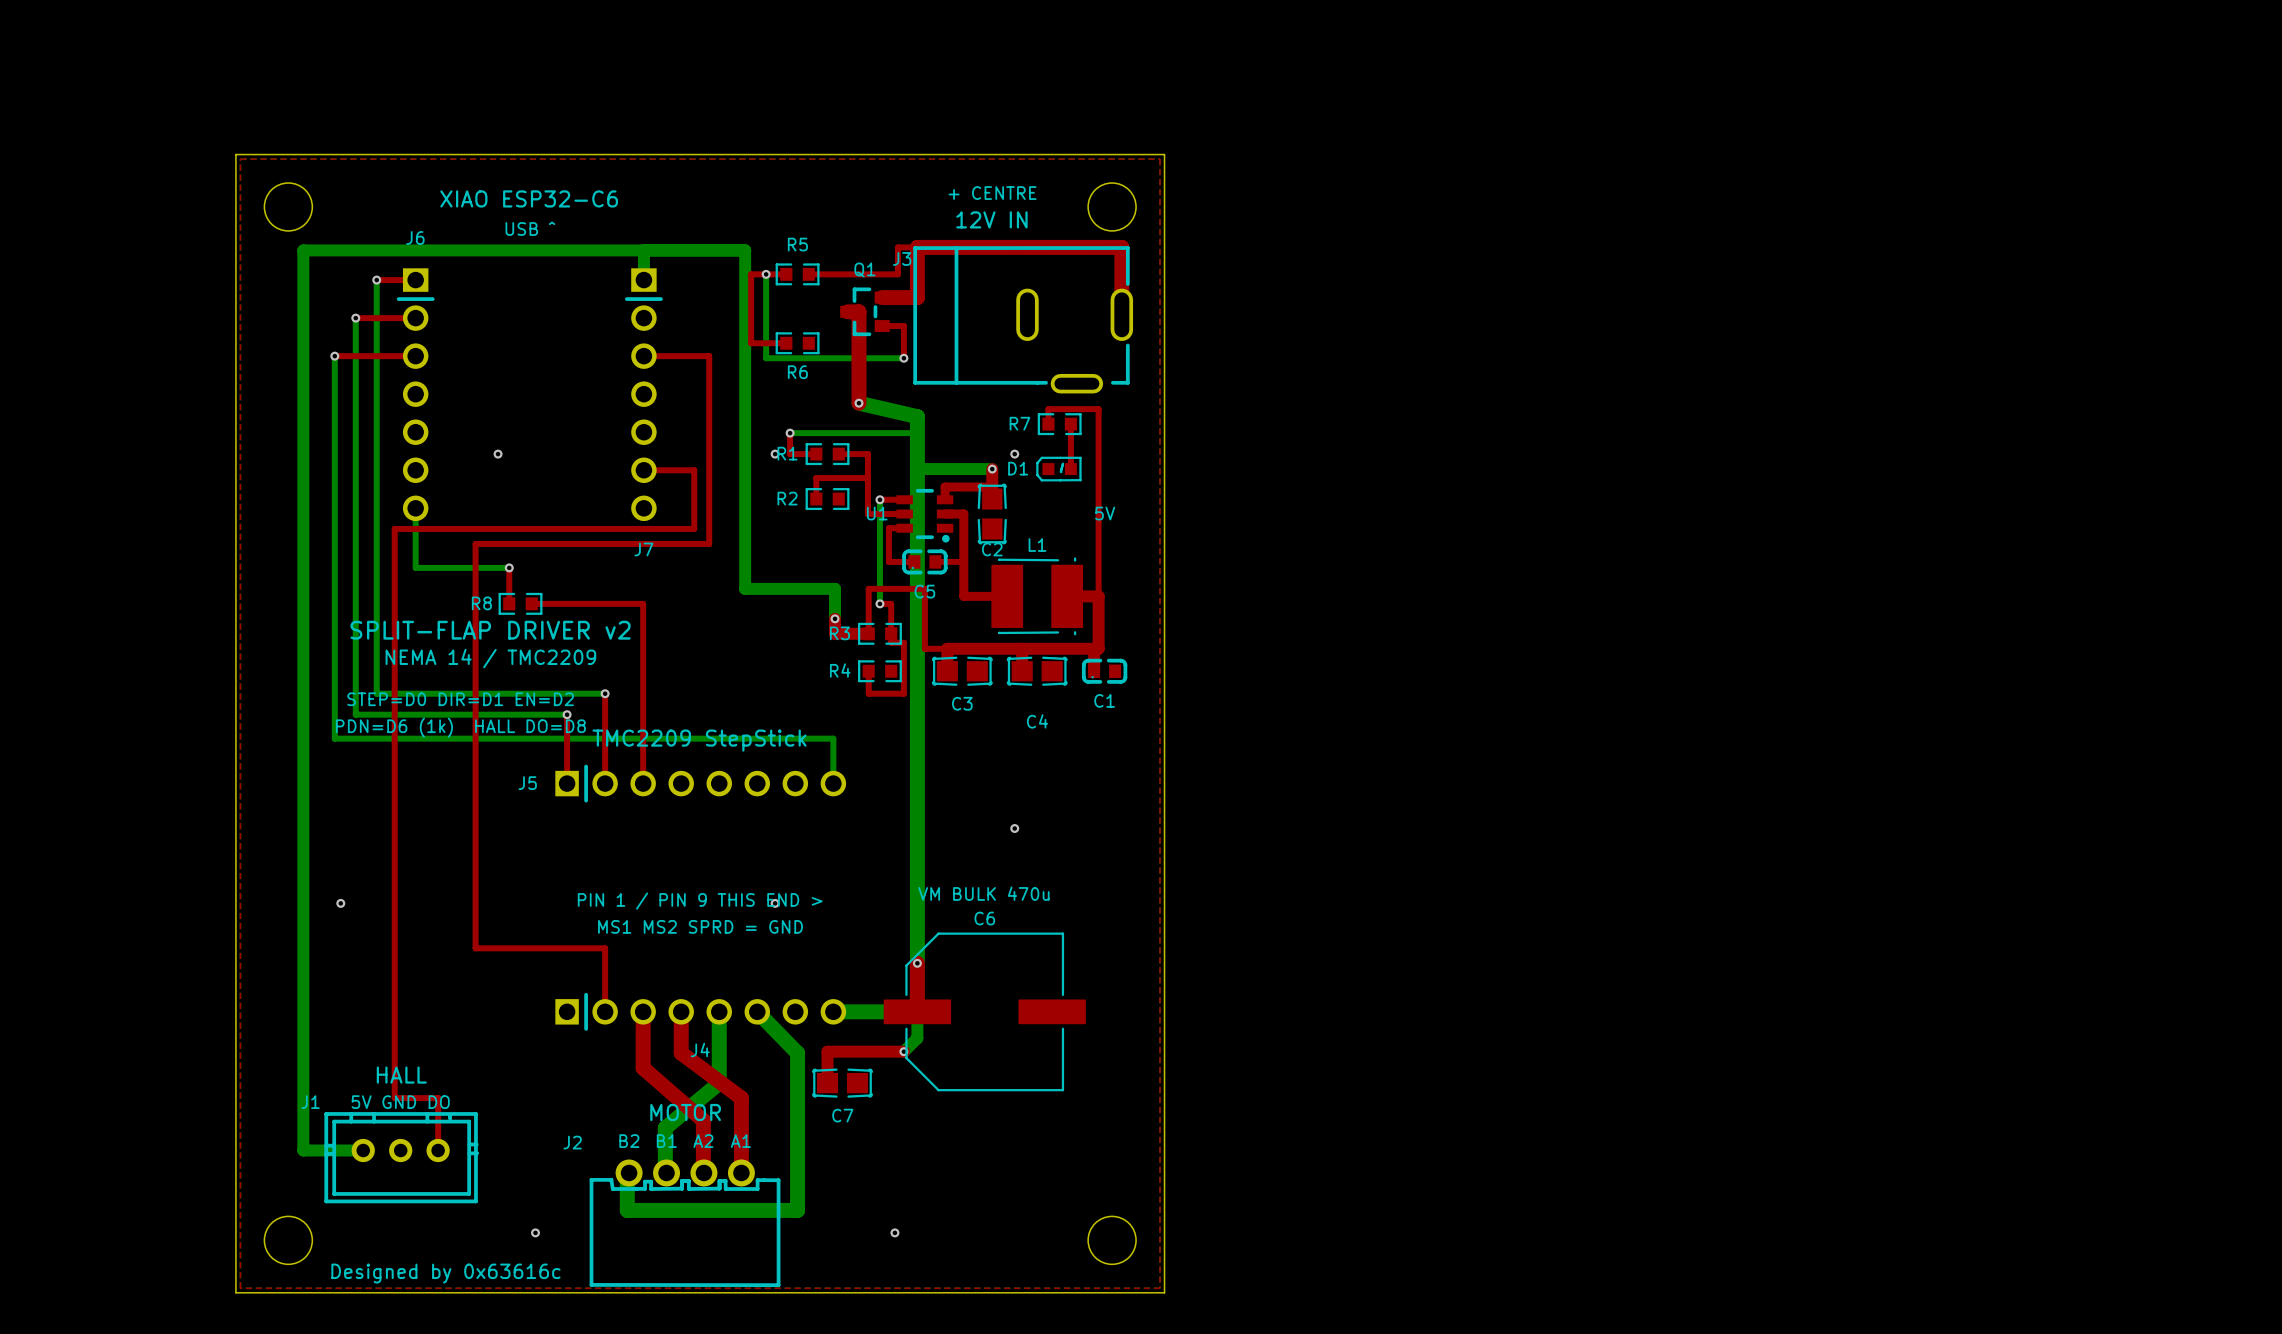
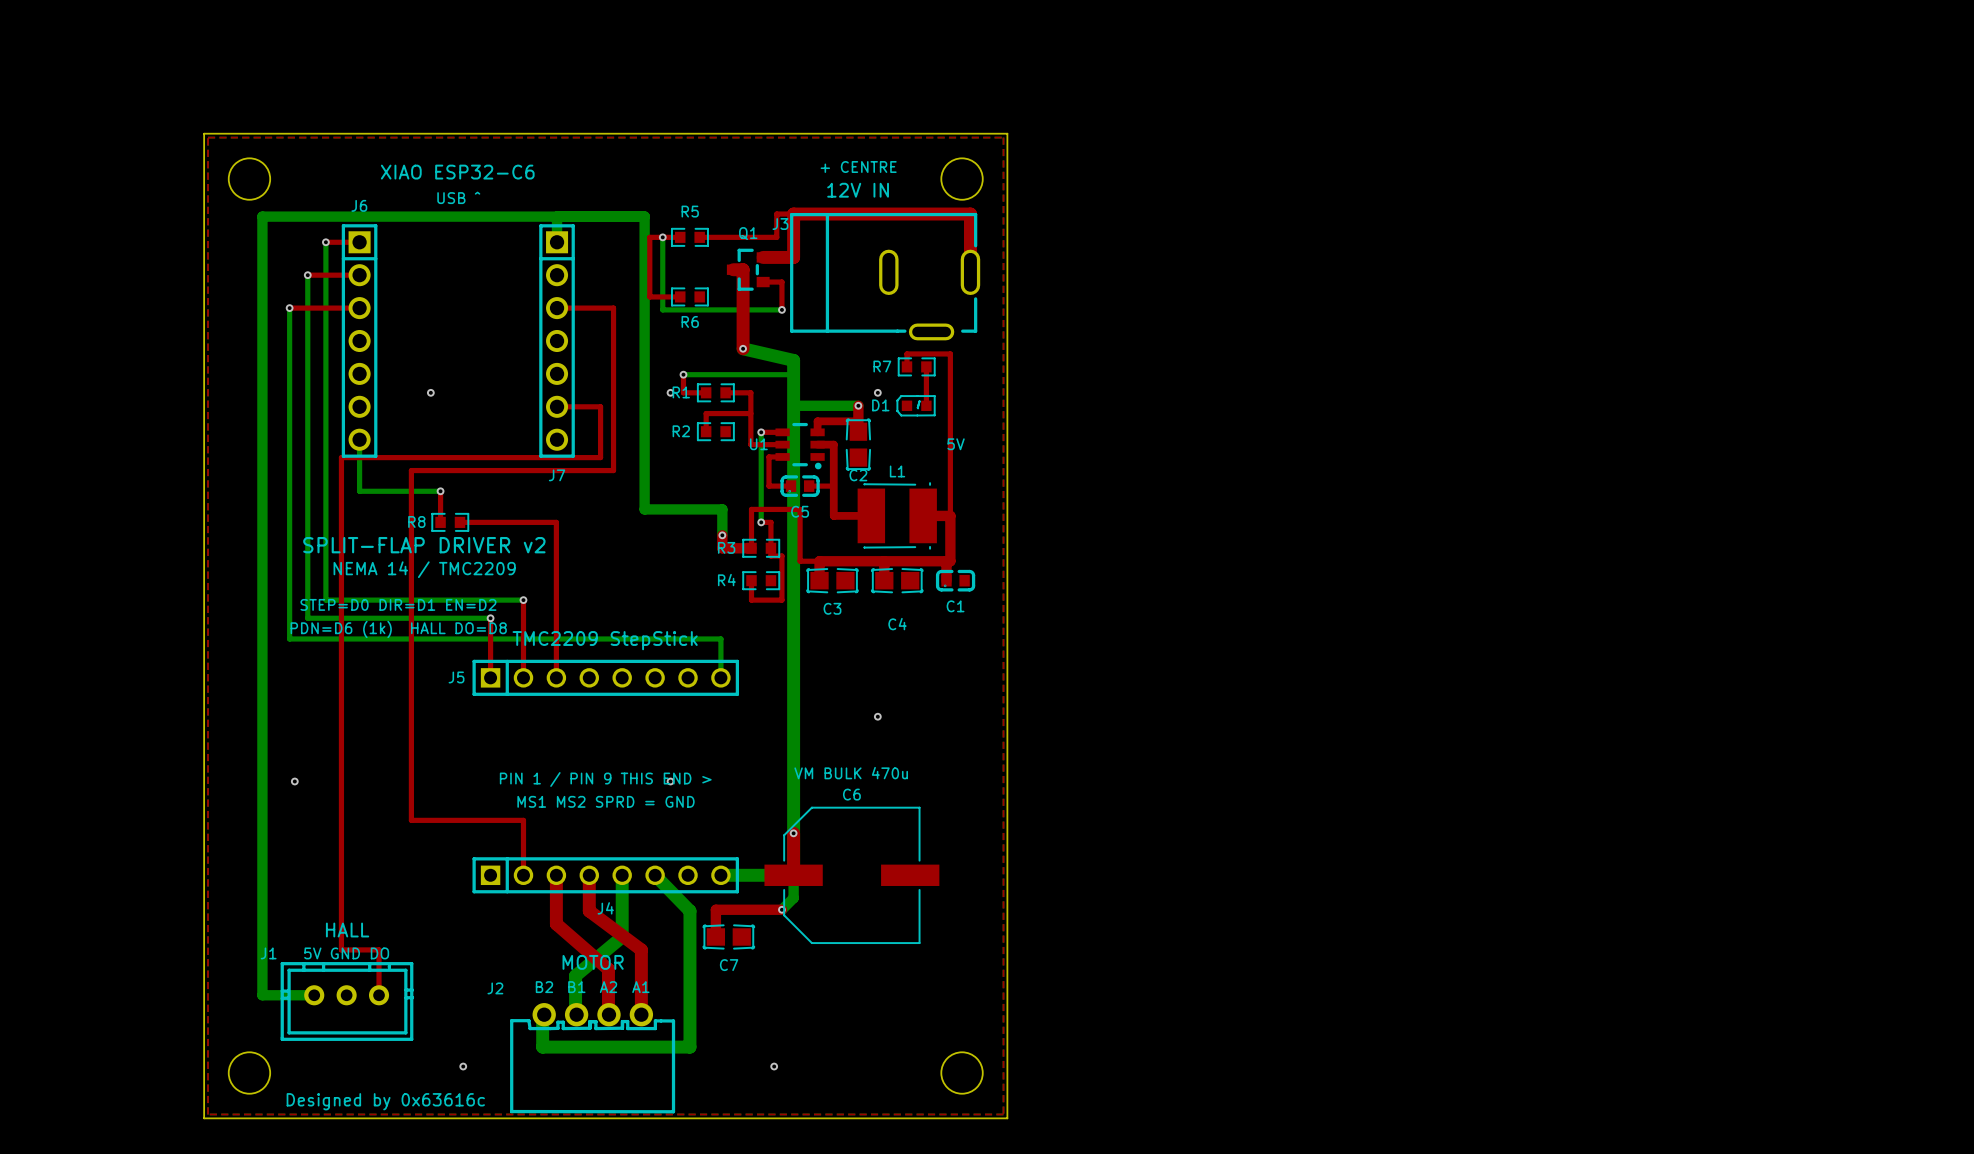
J6 footprint: [396, 268, 435, 522] -> [341, 224, 378, 458]
J7 footprint: [624, 268, 663, 522] -> [539, 224, 575, 458]
J5 footprint: [555, 764, 847, 803] -> [472, 659, 740, 696]
J4 footprint: [555, 992, 847, 1031] -> [472, 857, 740, 894]

